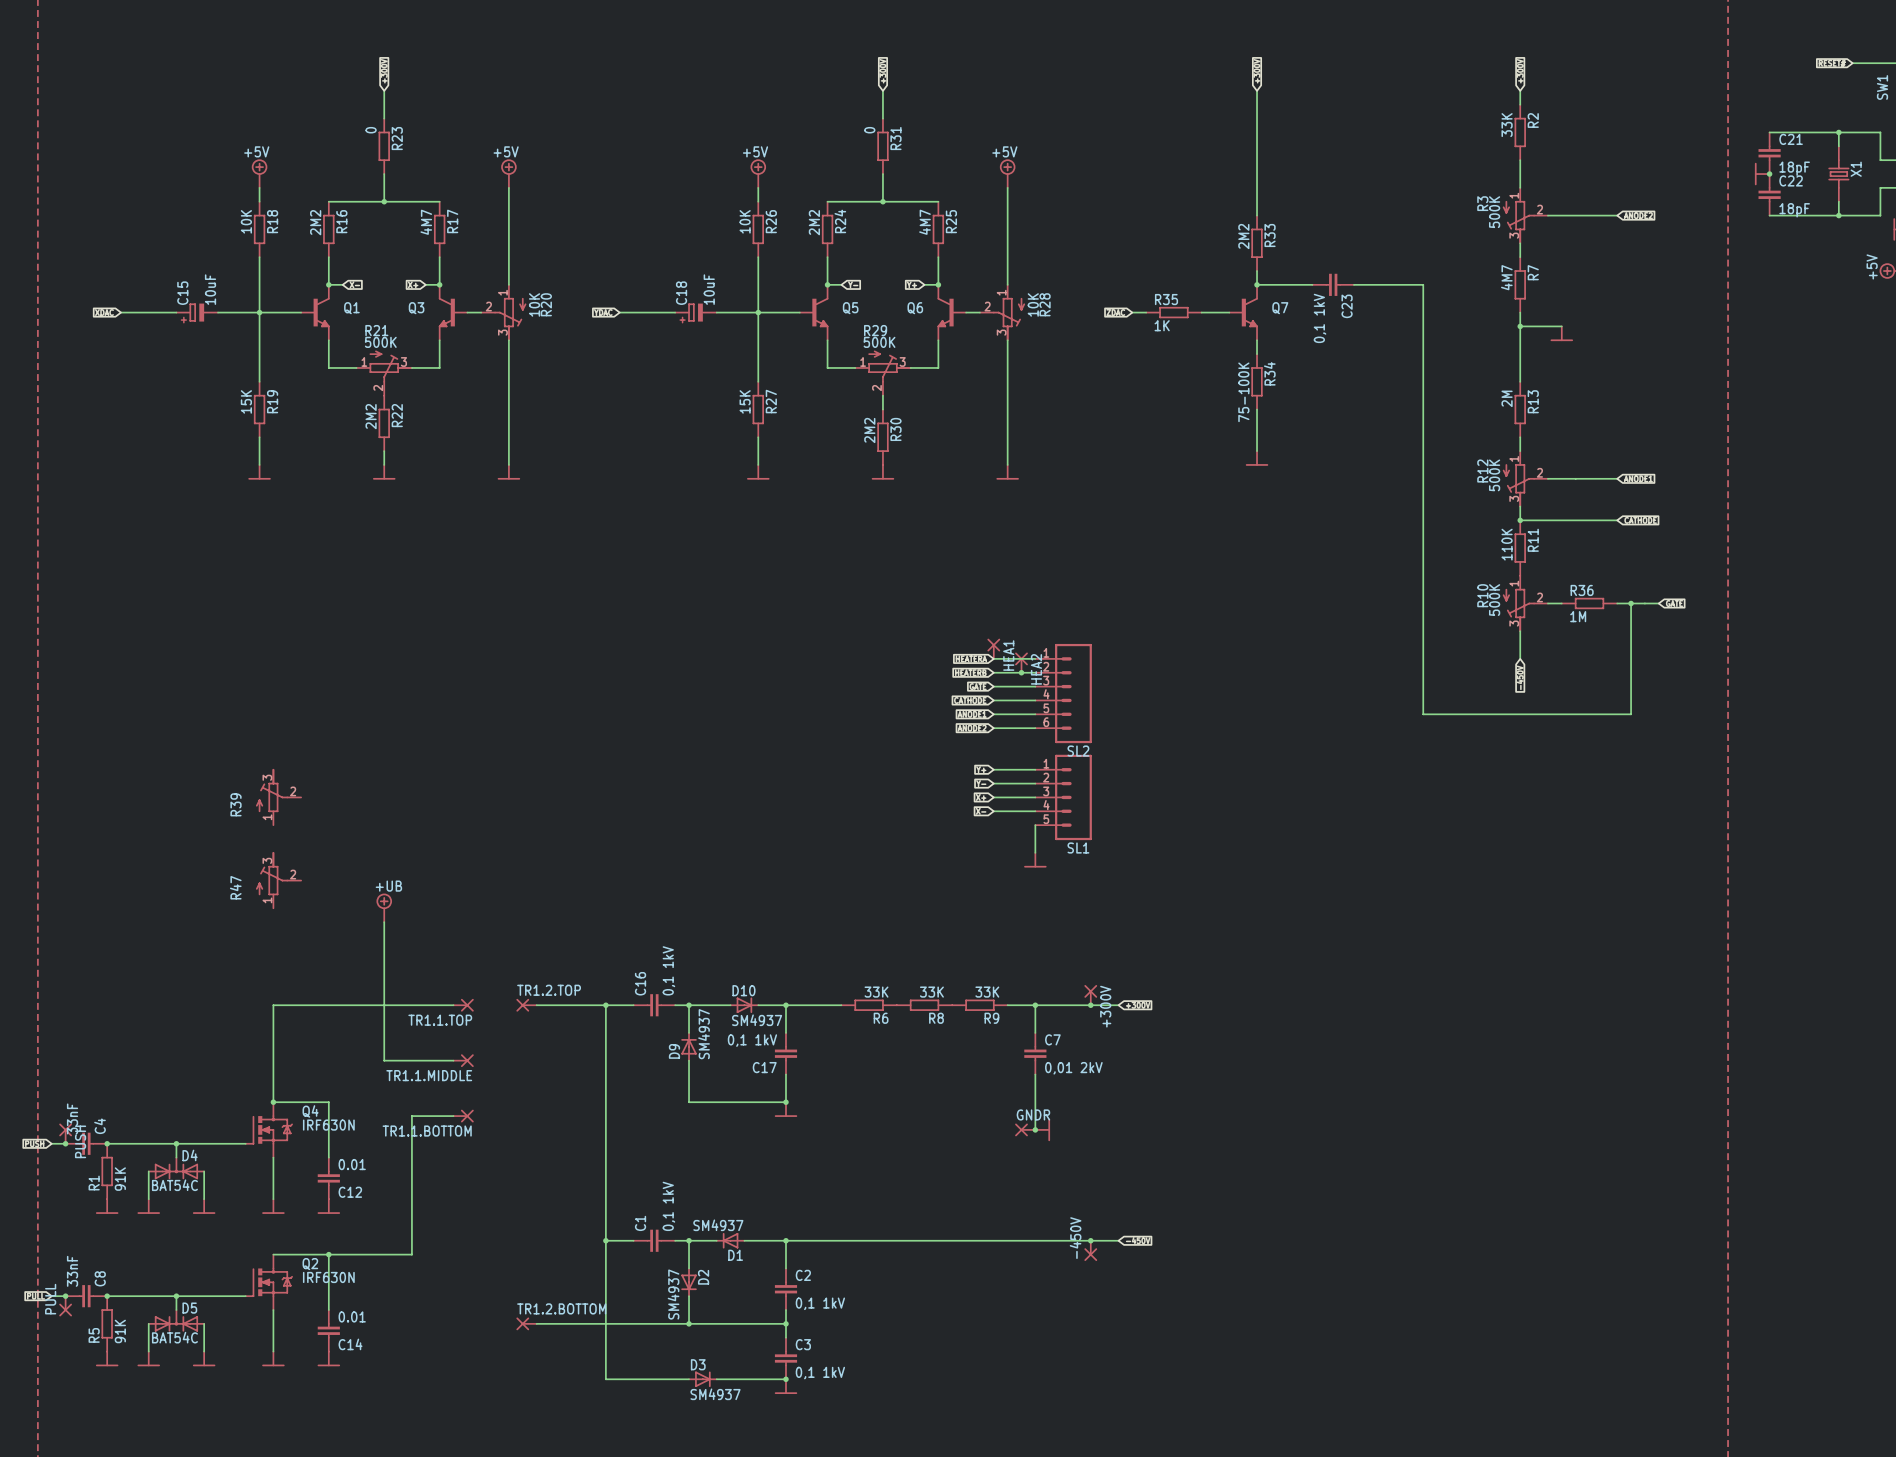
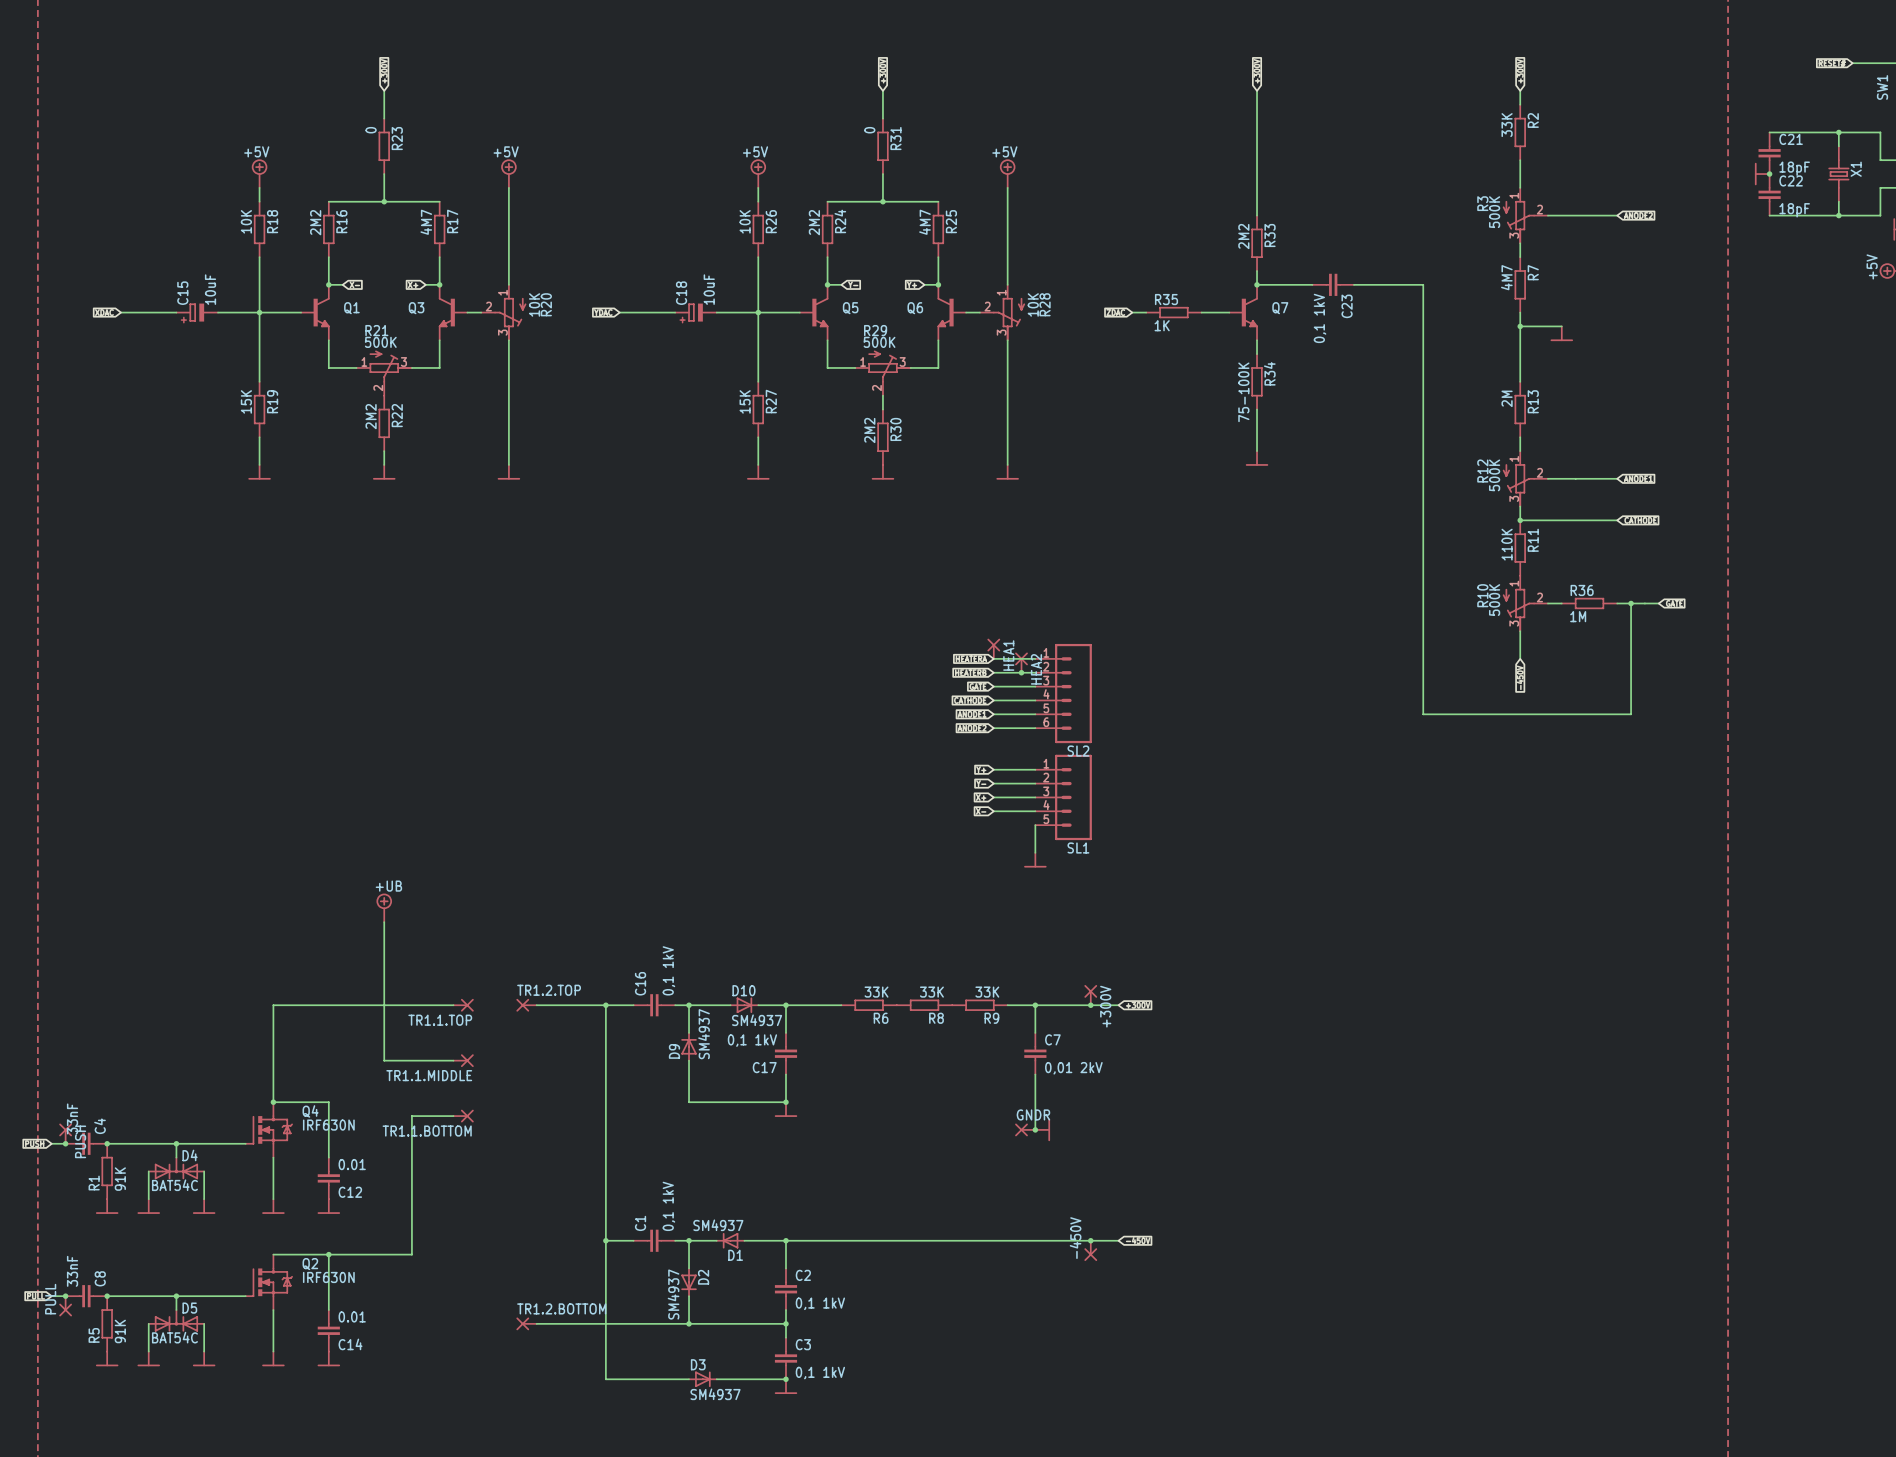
R39: (278, 797) -> none
R47: (278, 880) -> none

